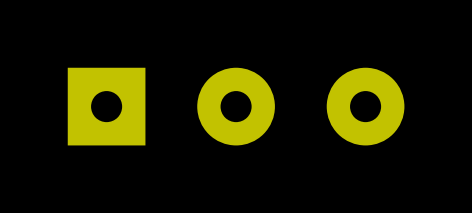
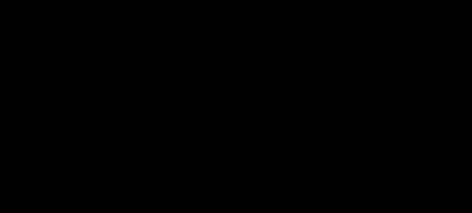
part: (236, 106) -> none

